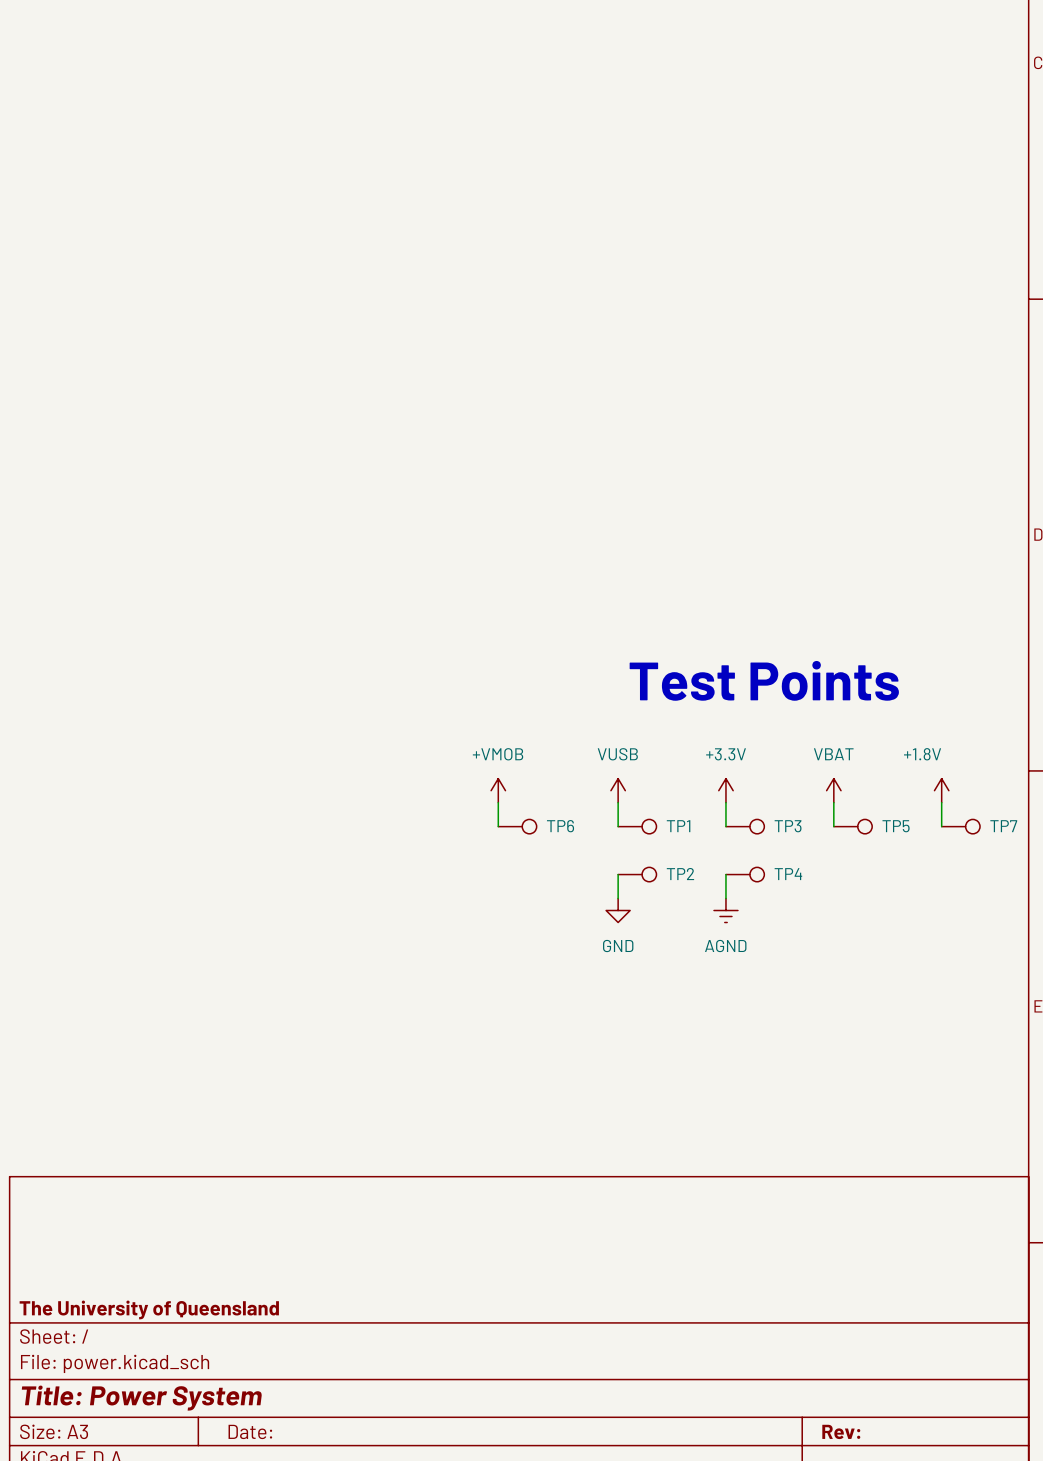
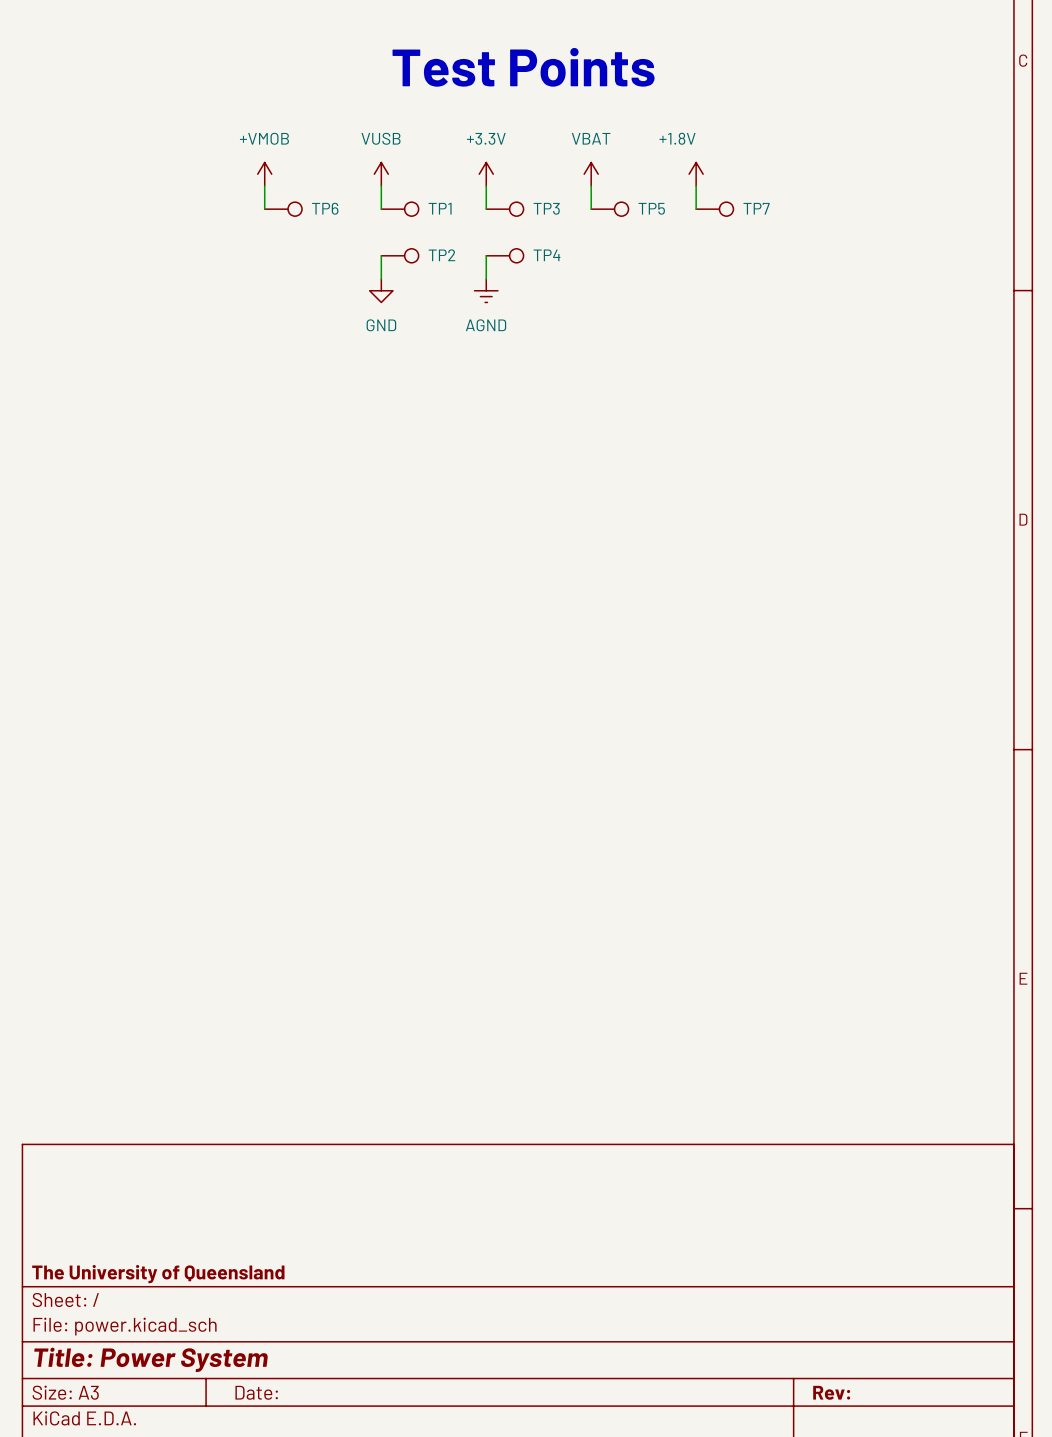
text: none -> Test Points (523, 67)
power symbol: none -> +VMOB (264, 174)
power symbol: none -> VUSB (381, 174)
power symbol: none -> +3.3V (486, 174)
power symbol: none -> VBAT (591, 174)
power symbol: none -> +1.8V (696, 174)
wire: none -> (264, 185) (264, 209)
wire: none -> (381, 185) (381, 209)
wire: none -> (486, 185) (486, 209)
wire: none -> (591, 185) (591, 209)
wire: none -> (696, 185) (696, 209)
wire: none -> (381, 255) (381, 279)
wire: none -> (486, 255) (486, 279)
power symbol: none -> GND (381, 290)
power symbol: none -> AGND (486, 290)
text: Test Points (764, 680) -> none
power symbol: +VMOB (498, 790) -> none
power symbol: VUSB (618, 790) -> none
power symbol: +3.3V (725, 790) -> none
power symbol: VBAT (833, 790) -> none
power symbol: +1.8V (941, 790) -> none
wire: (498, 802) (498, 826) -> none
wire: (618, 802) (618, 826) -> none
wire: (725, 802) (725, 826) -> none
wire: (833, 802) (833, 826) -> none
wire: (941, 802) (941, 826) -> none
TP6 position: (517, 826) -> (283, 209)
TP1 position: (637, 826) -> (399, 209)
TP3 position: (745, 826) -> (504, 209)
TP5 position: (853, 826) -> (609, 209)
TP7 position: (960, 826) -> (714, 209)
wire: (618, 874) (618, 898) -> none
TP2 position: (637, 874) -> (399, 255)
wire: (725, 874) (725, 898) -> none
TP4 position: (745, 874) -> (504, 255)
power symbol: GND (618, 910) -> none
power symbol: AGND (725, 910) -> none

